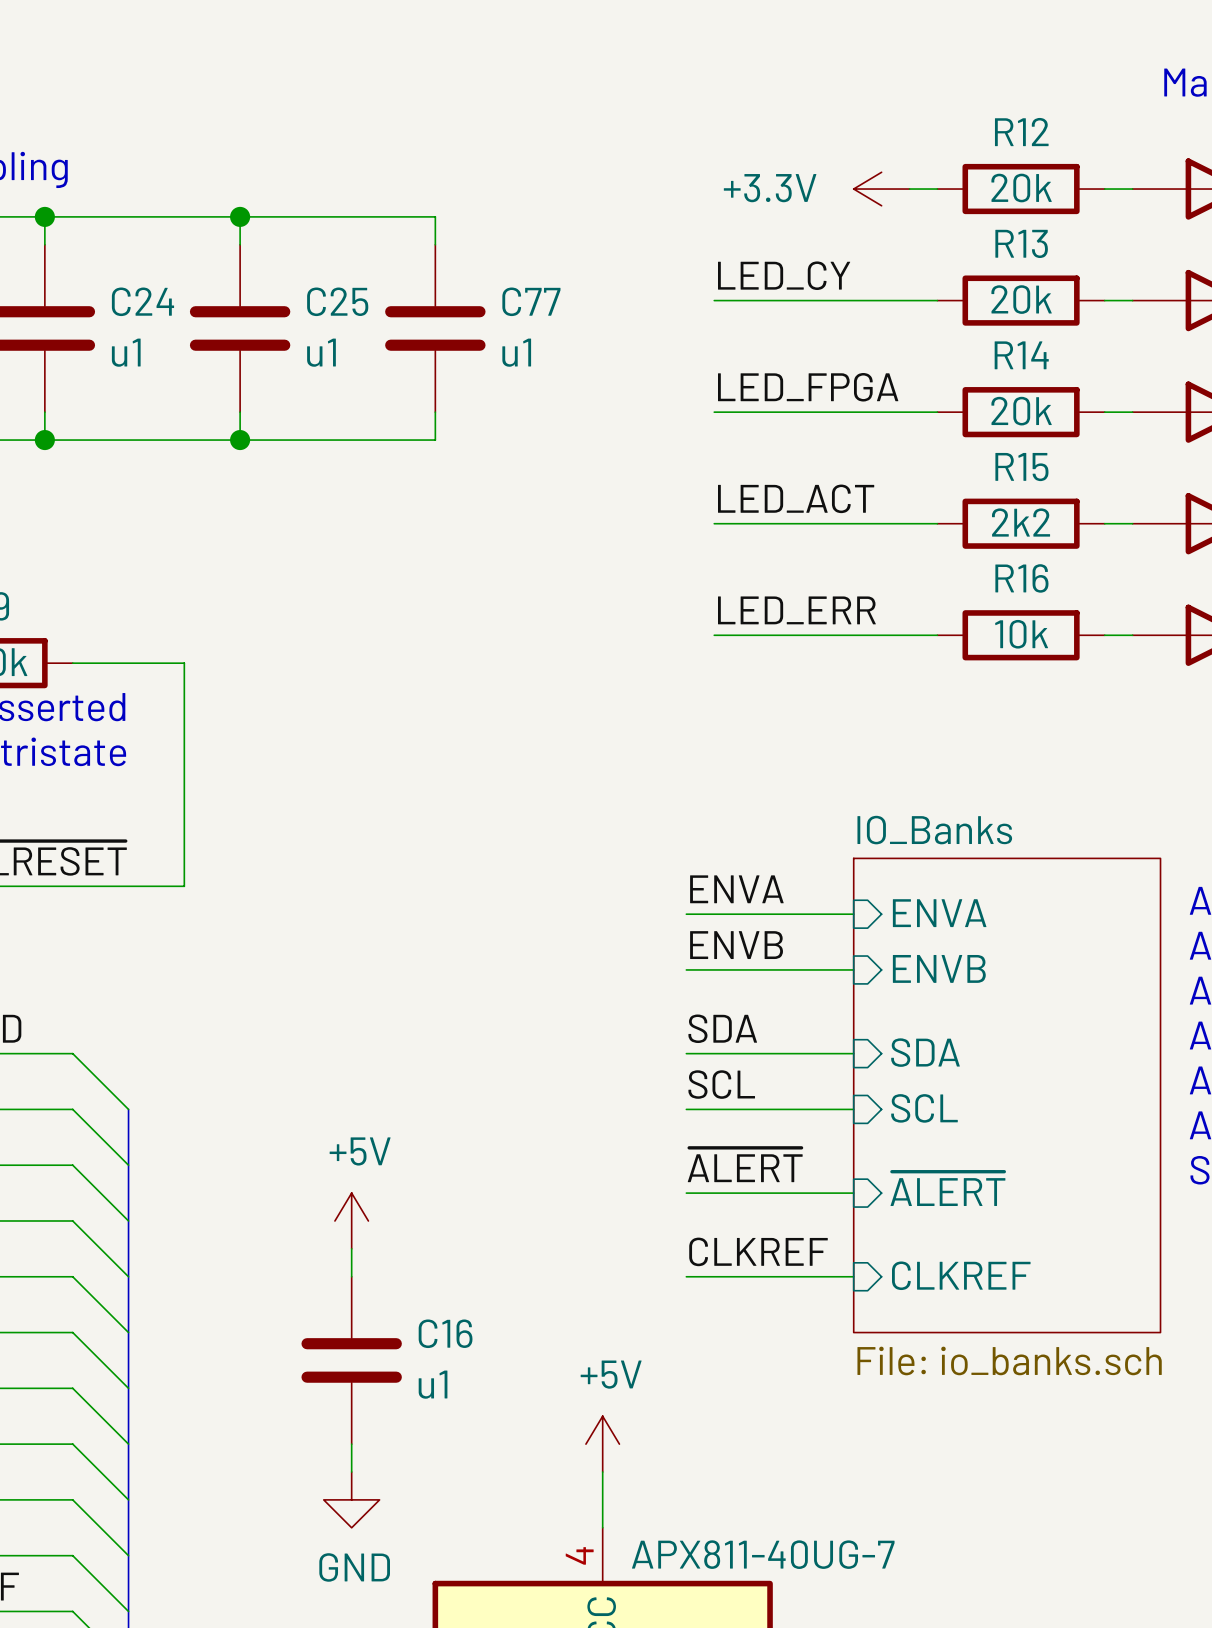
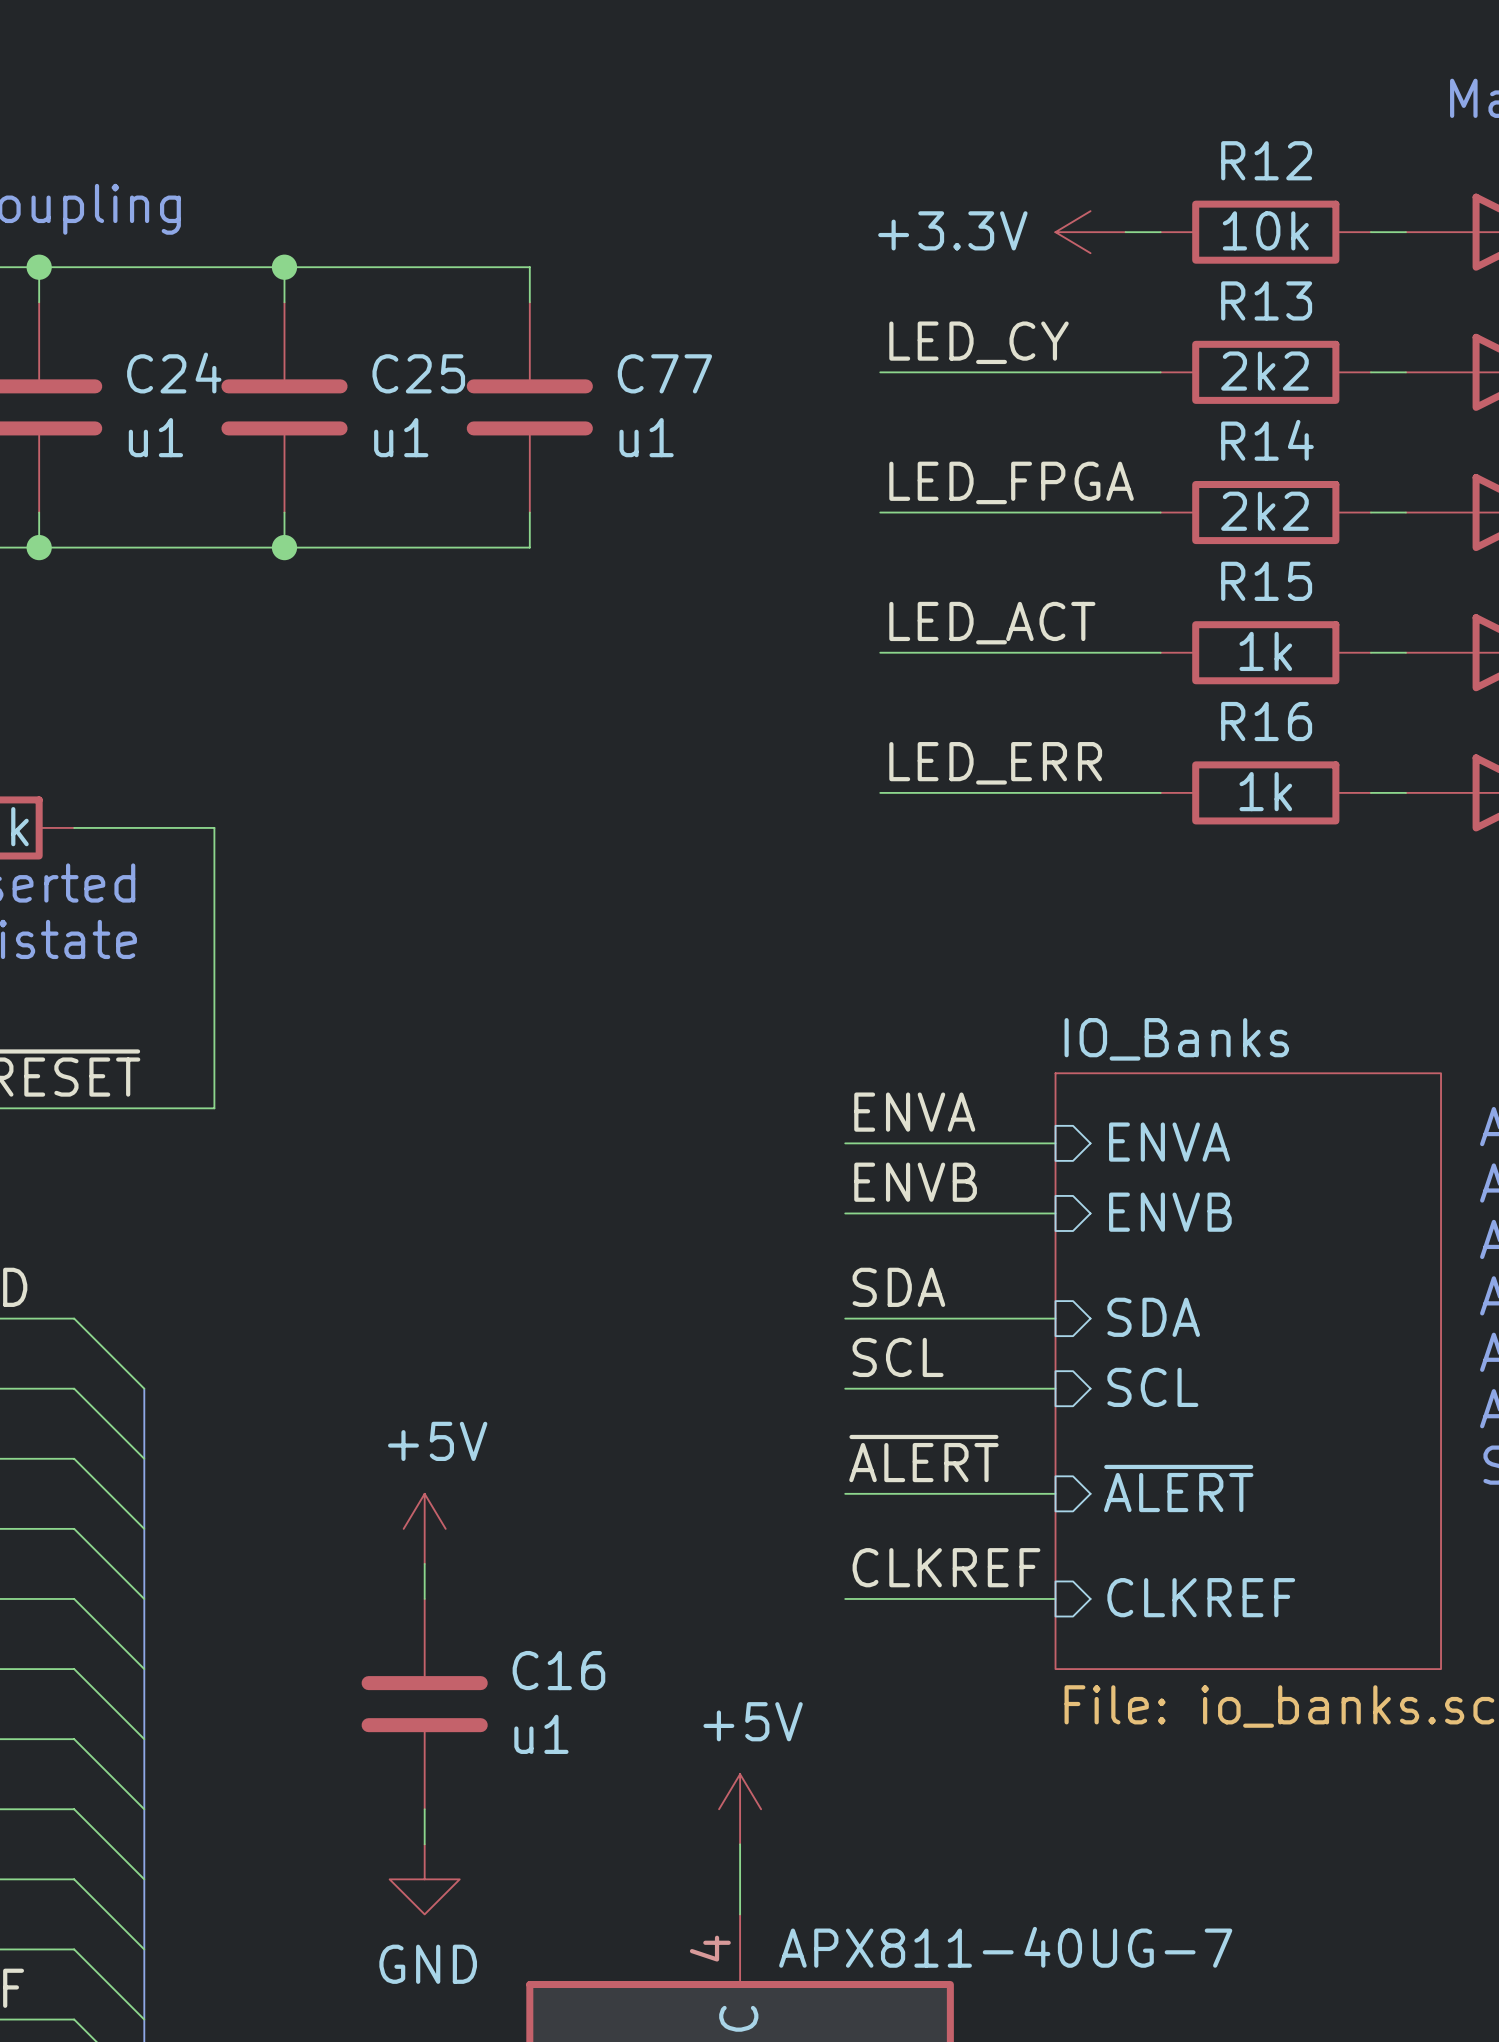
R12 value: 20k (1021, 187) -> 10k (1265, 230)
R13 value: 20k (1021, 299) -> 2k2 (1264, 371)
R14 value: 20k (1021, 411) -> 2k2 (1264, 511)
R15 value: 2k2 (1021, 522) -> 1k (1265, 651)
R16 value: 10k (1021, 634) -> 1k (1265, 791)

